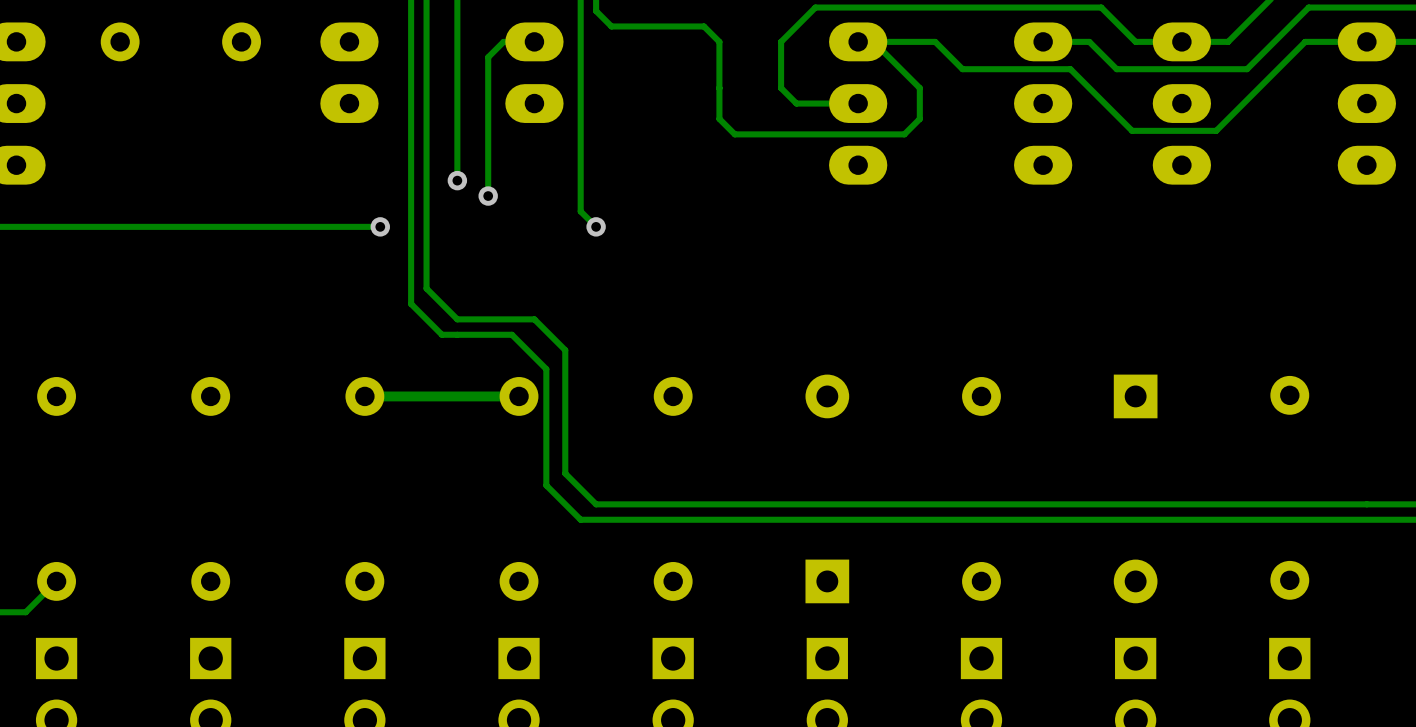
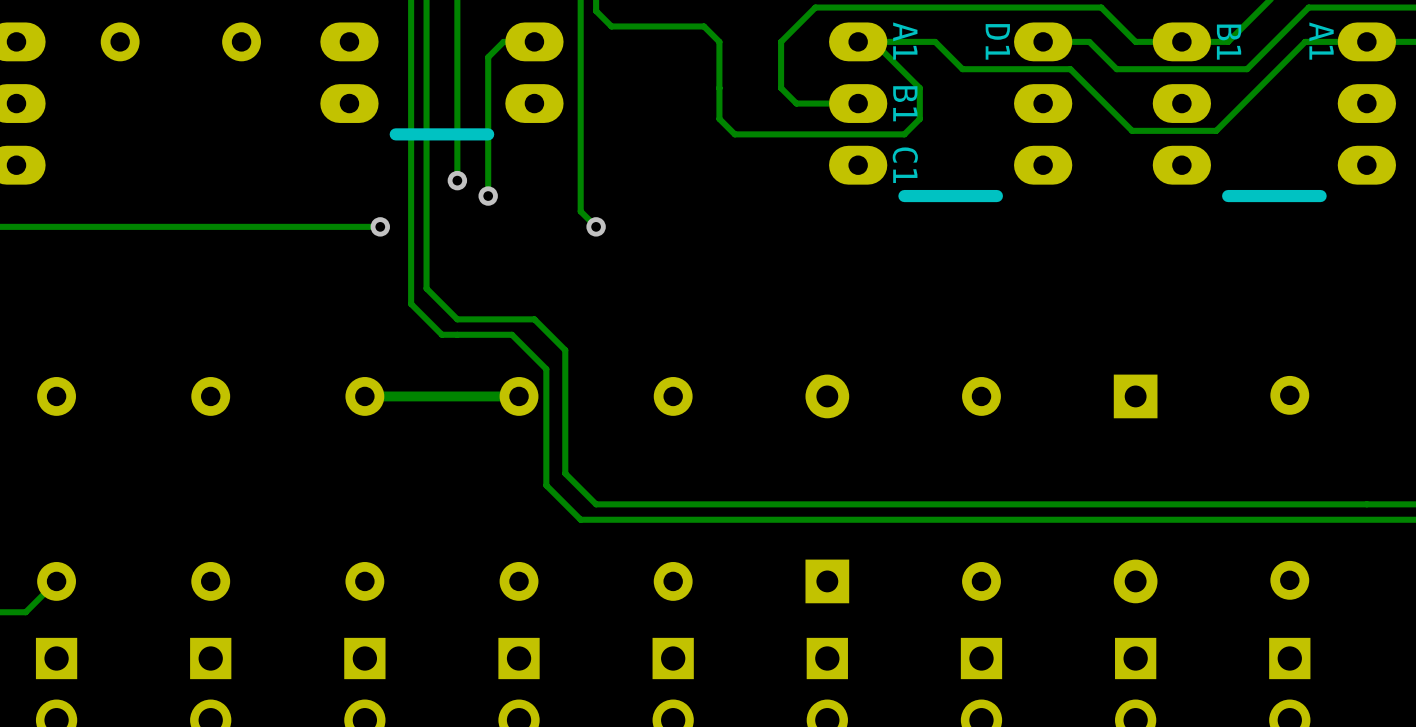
text: none -> A1 (905, 41)
text: none -> D1 (997, 41)
text: none -> A1 (1321, 41)
text: none -> B1 (1229, 42)
text: none -> B1 (905, 103)
line: none -> (488, 134) (395, 134)
text: none -> C1 (905, 165)
line: none -> (996, 196) (904, 196)
line: none -> (1320, 196) (1228, 196)

